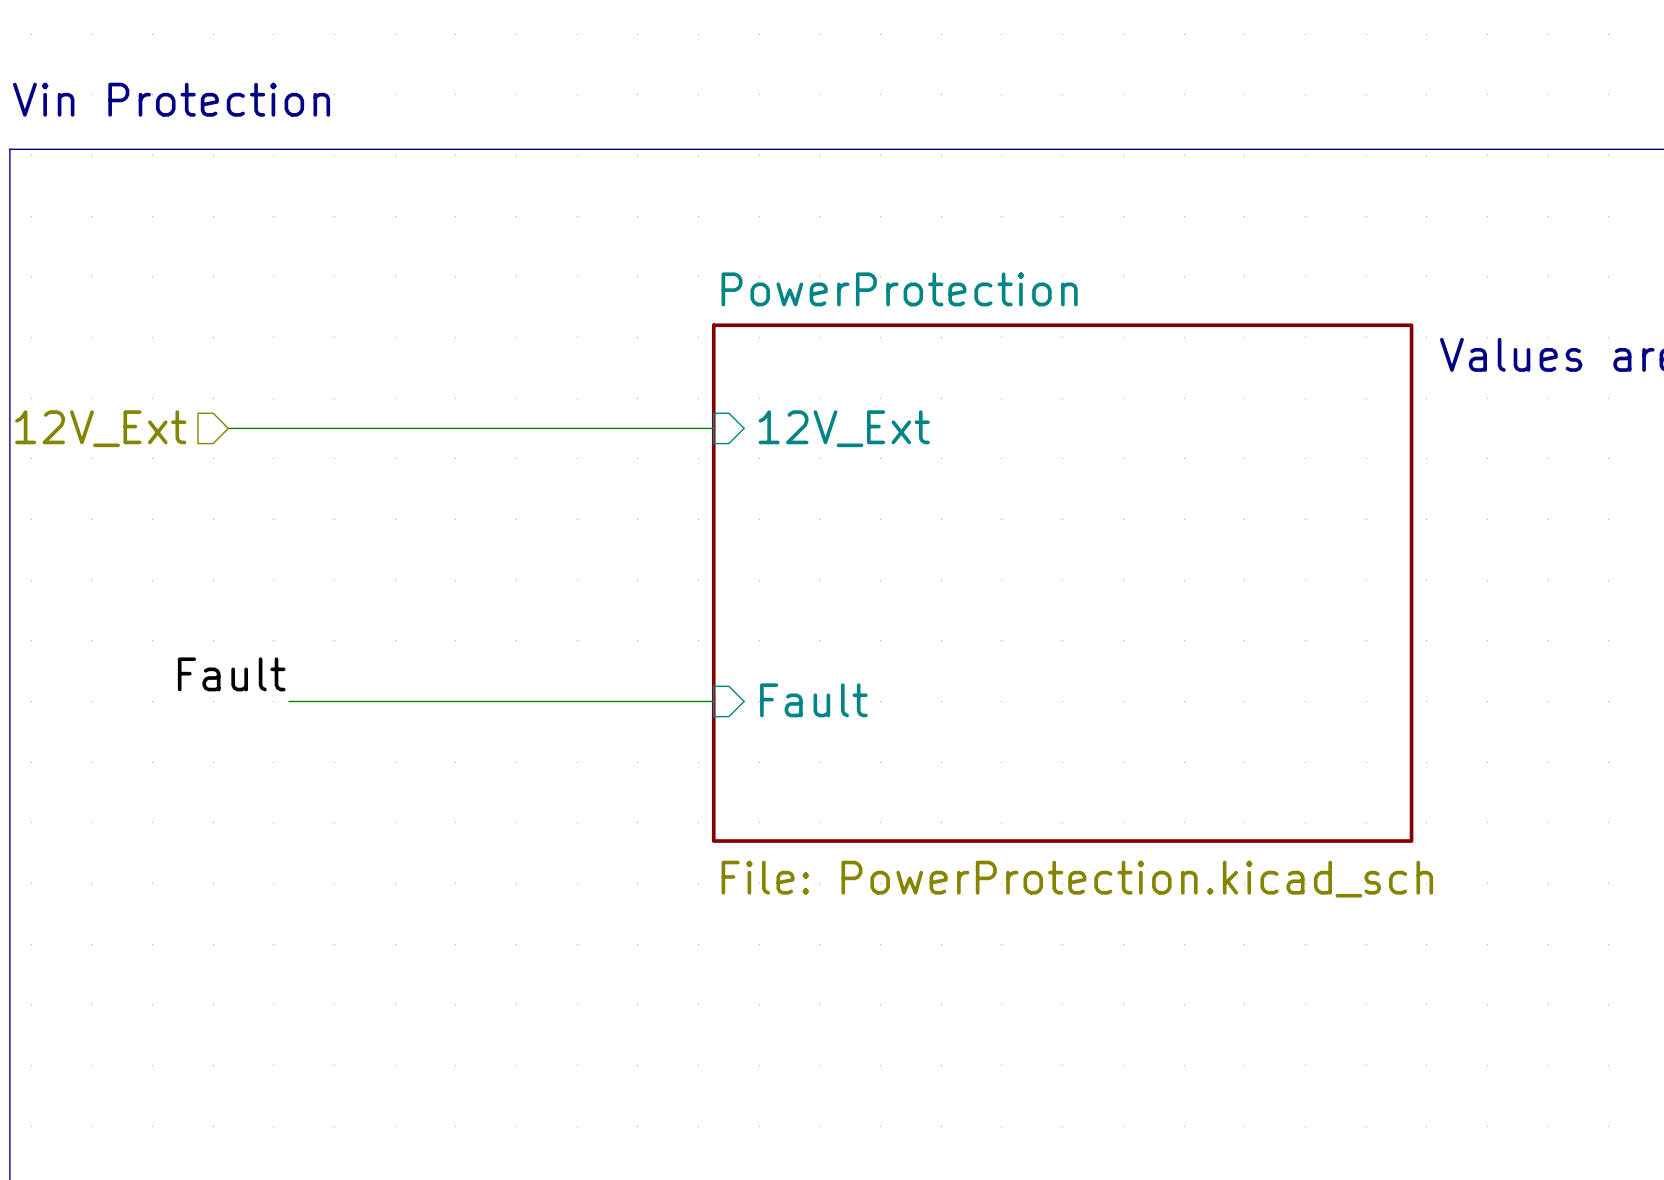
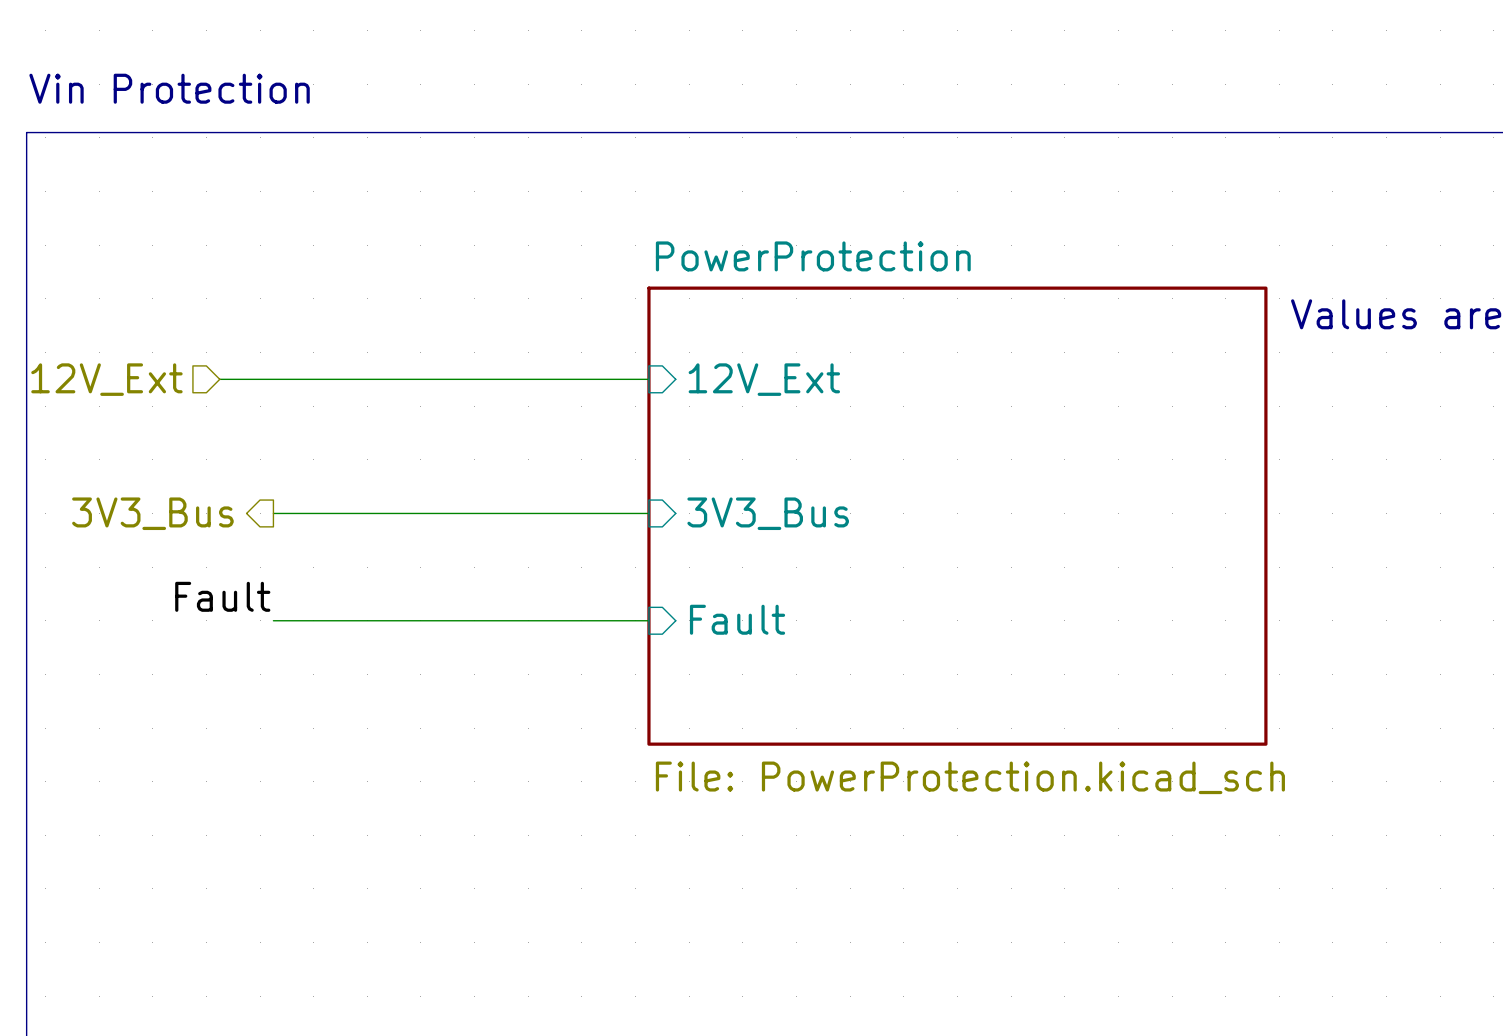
hierarchical label: none -> 3V3_Bus (152, 513)
wire: none -> (273, 513) (648, 513)
sheet pin: none -> 3V3_Bus (768, 513)

